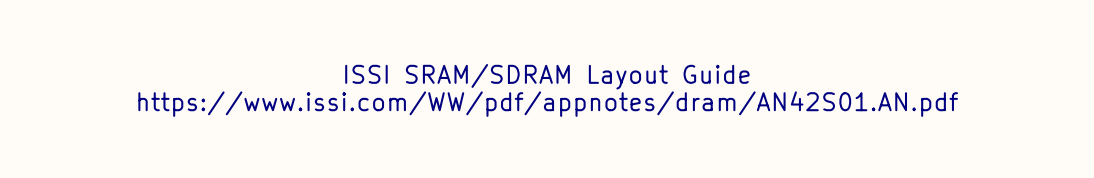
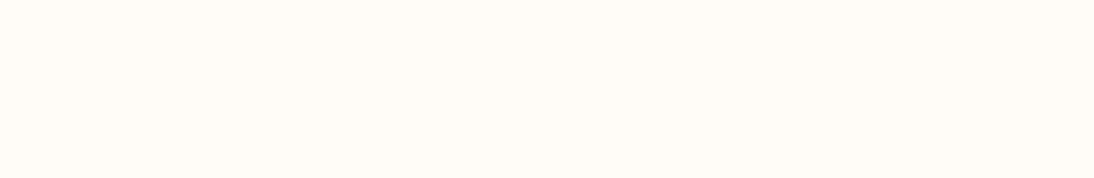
text: ISSI SRAM/SDRAM Layout Guide (547, 76) -> none
text: https://www.issi.com/WW/pdf/appnotes/dram/AN42S01.AN.pdf (548, 104) -> none

